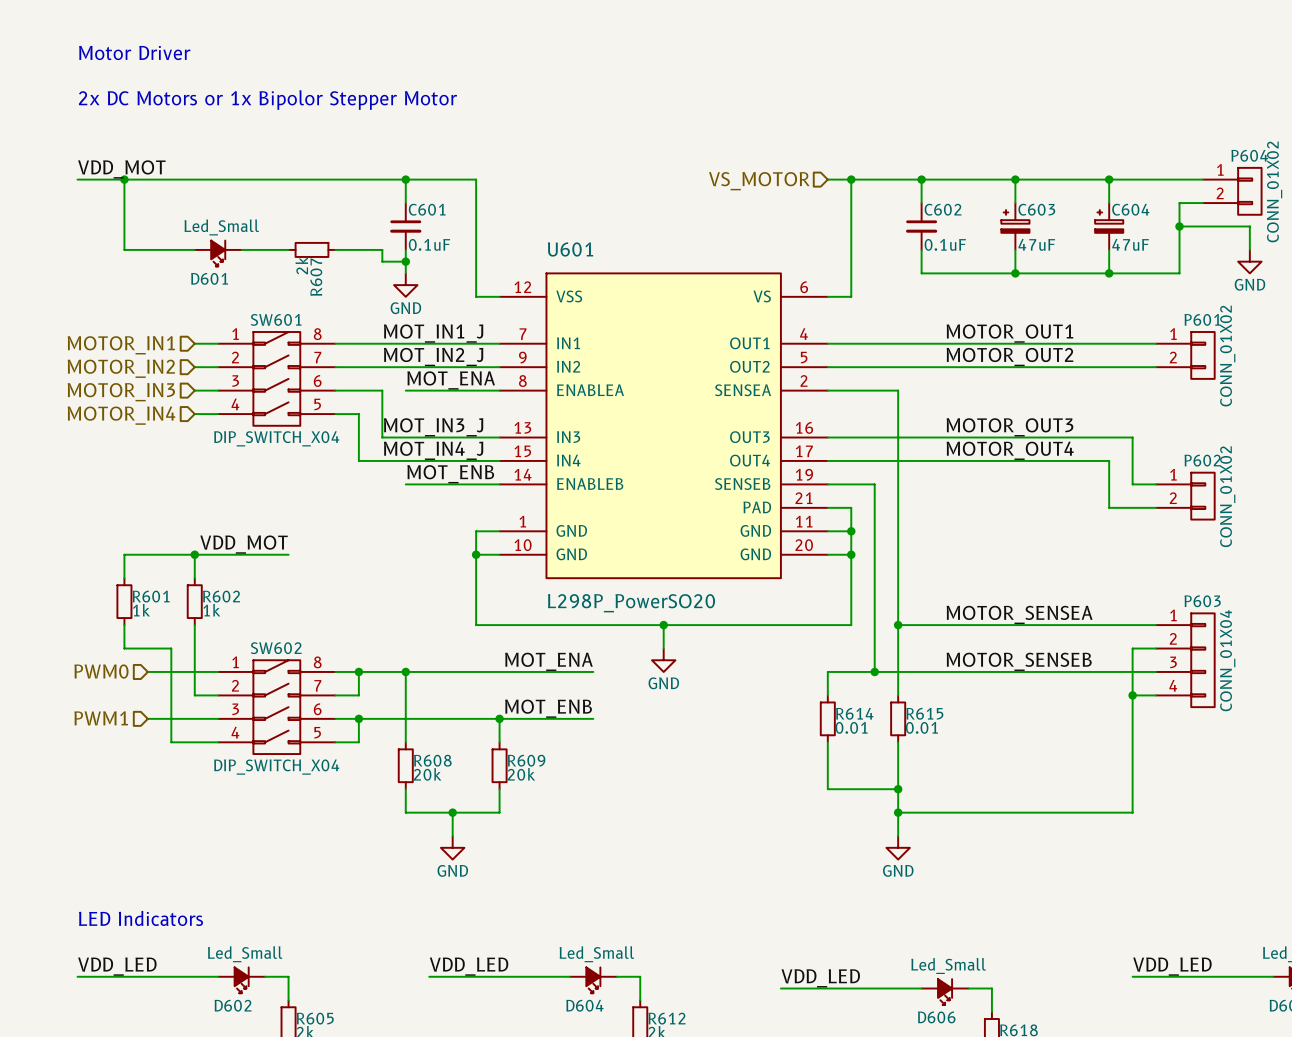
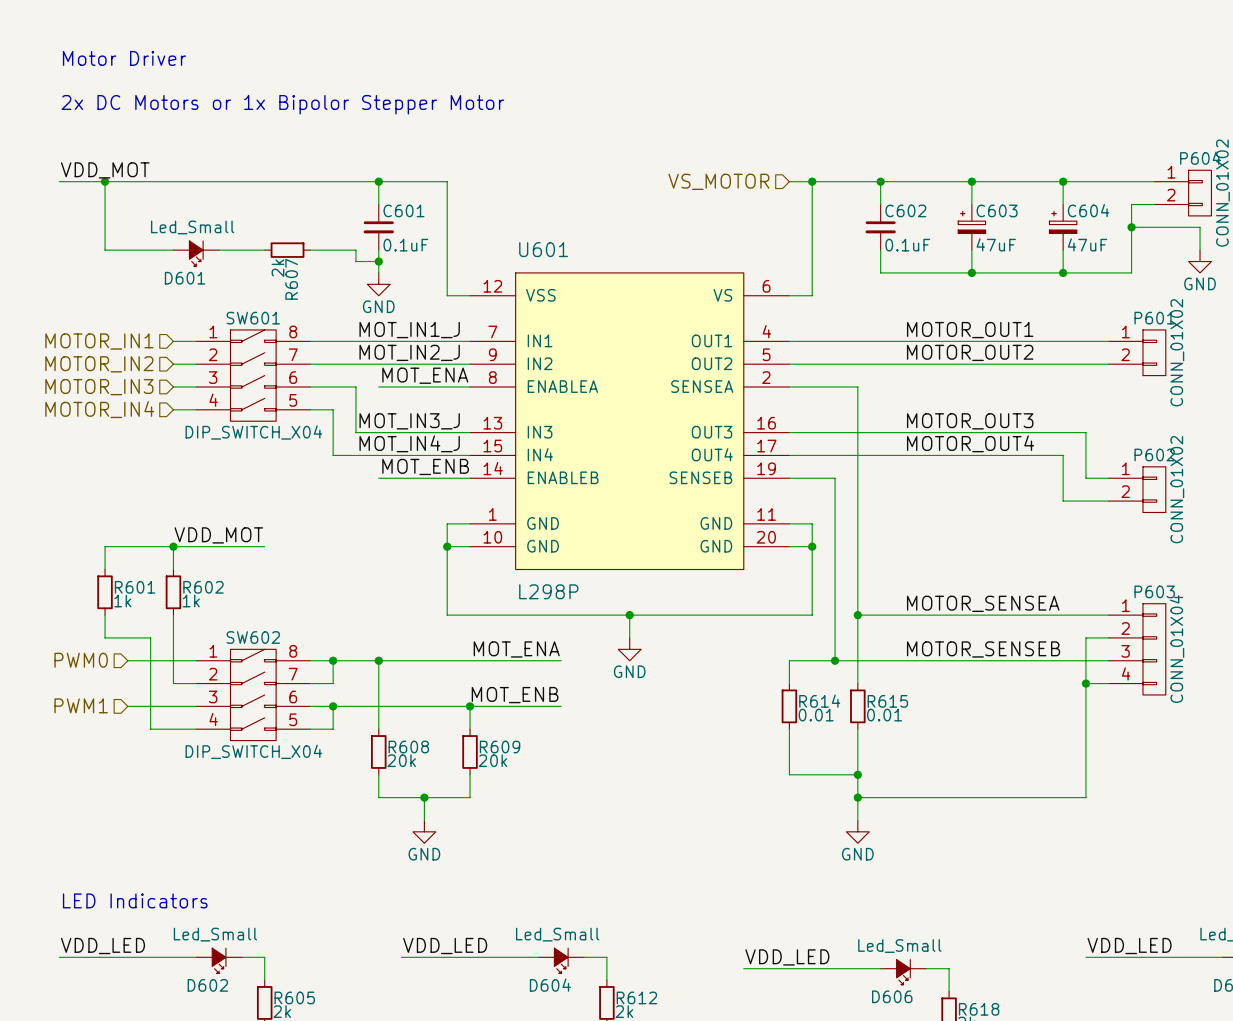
U601 symbol: [499, 273, 828, 579] -> [470, 272, 790, 570]
wire: (827, 507) (851, 507) (851, 531) -> none
junction: (851, 531) -> none
U601 value: L298P_PowerSO20 (631, 603) -> L298P (548, 591)

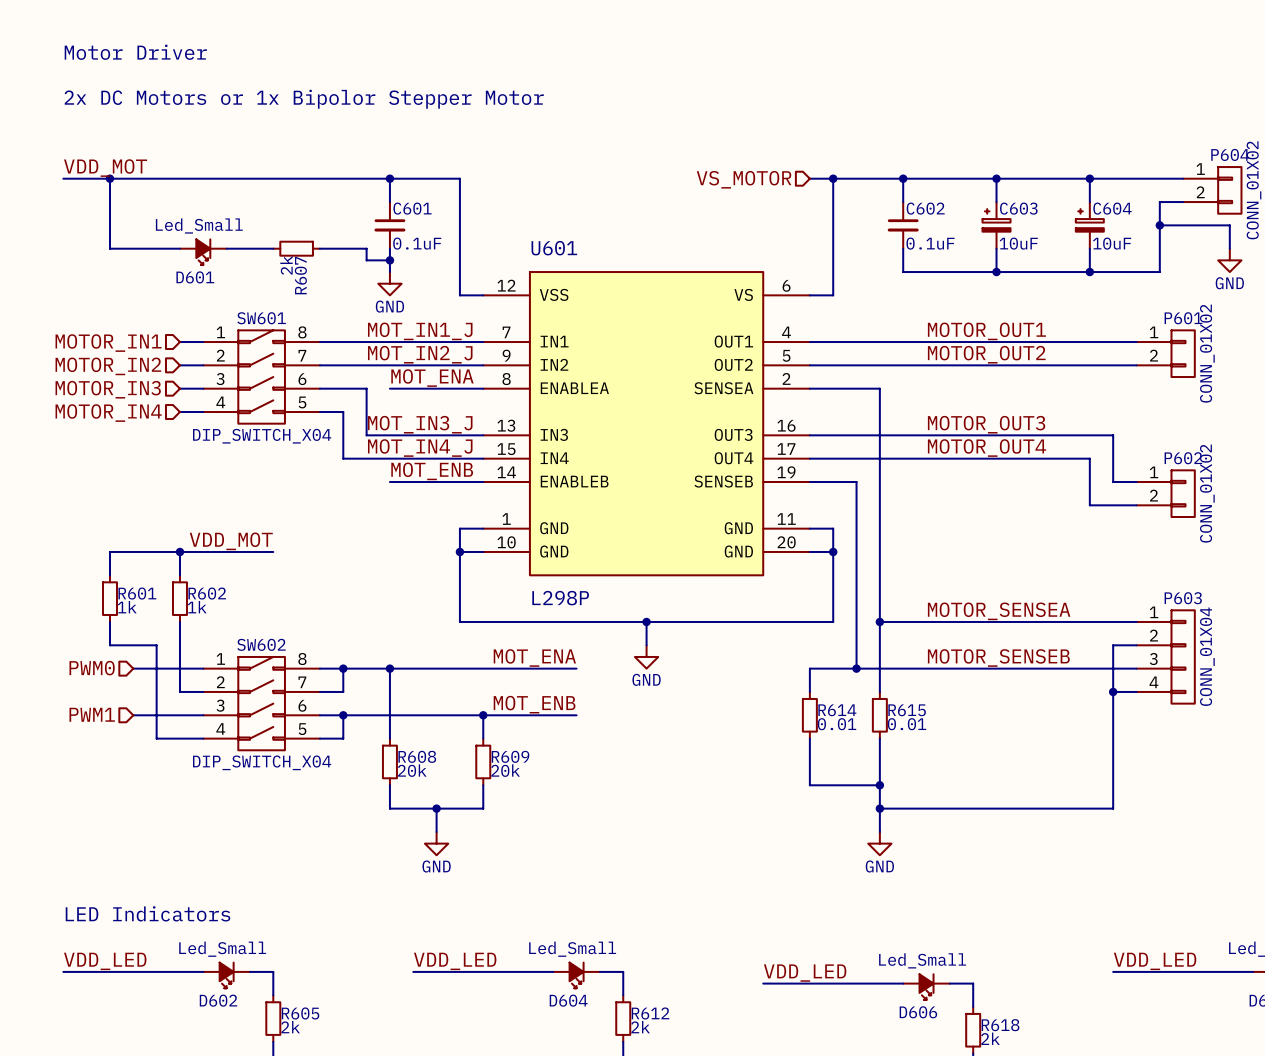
C603 value: 47uF (996, 244) -> 10uF (1018, 243)
C604 value: 47uF (1087, 244) -> 10uF (1112, 243)

